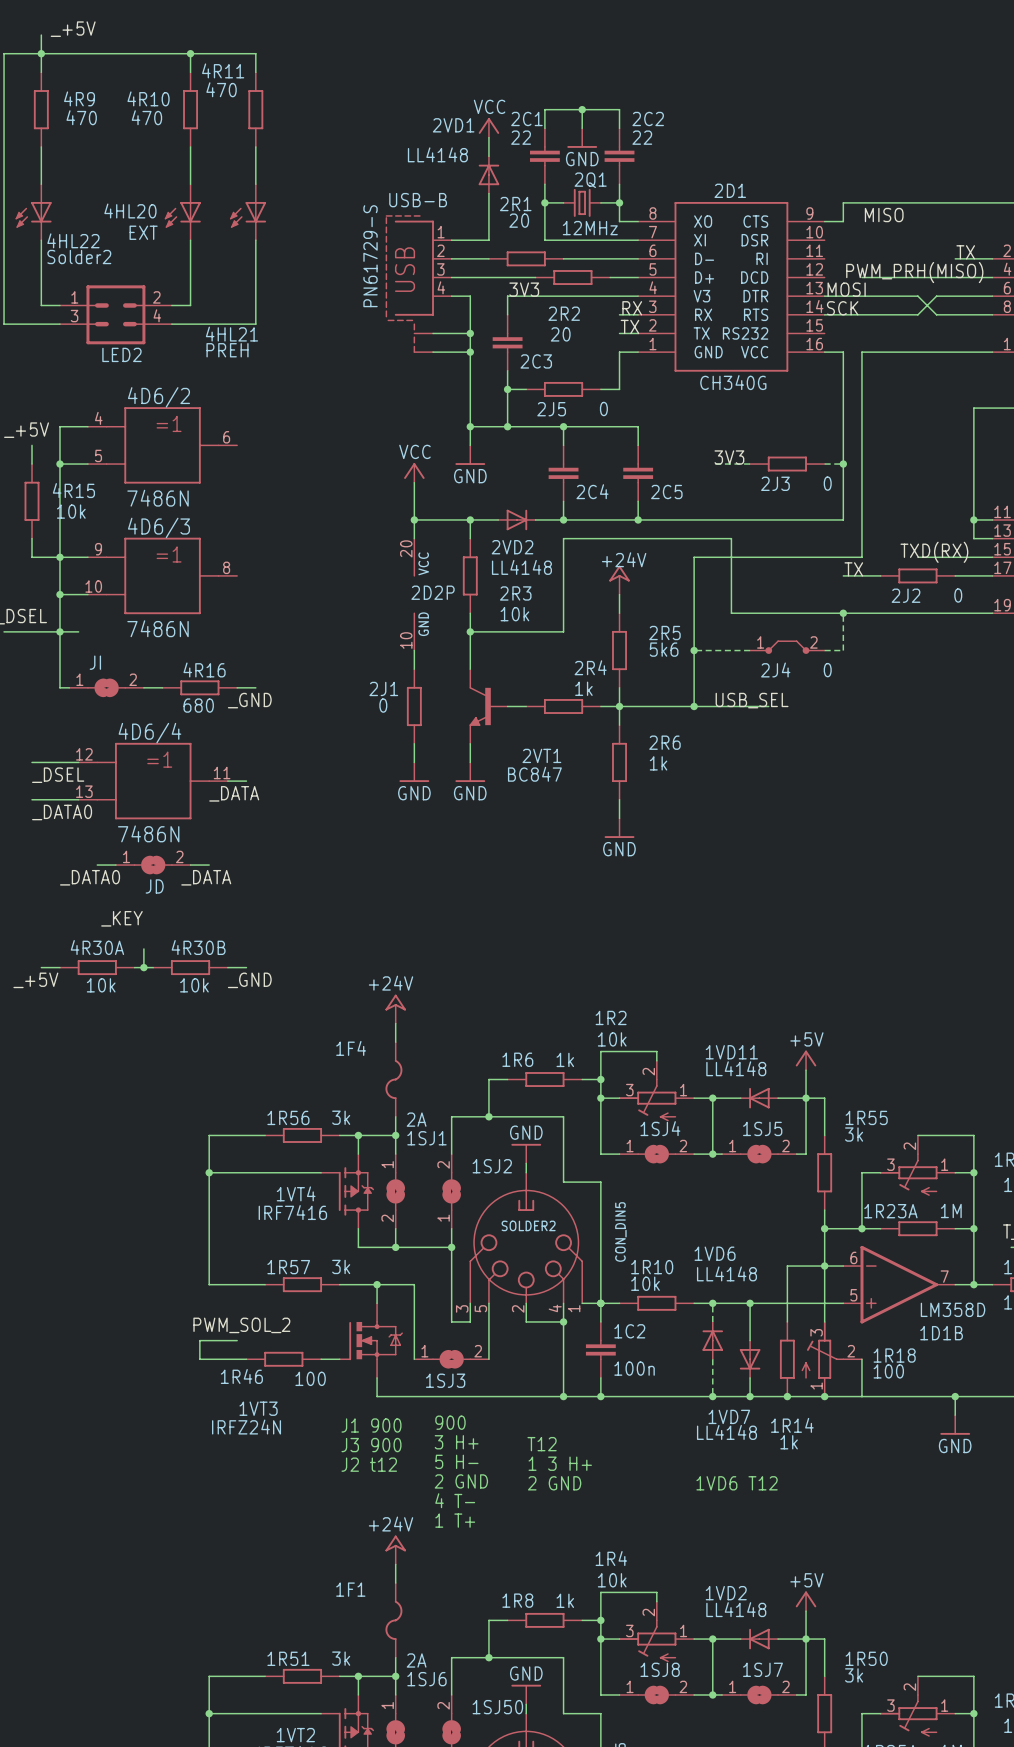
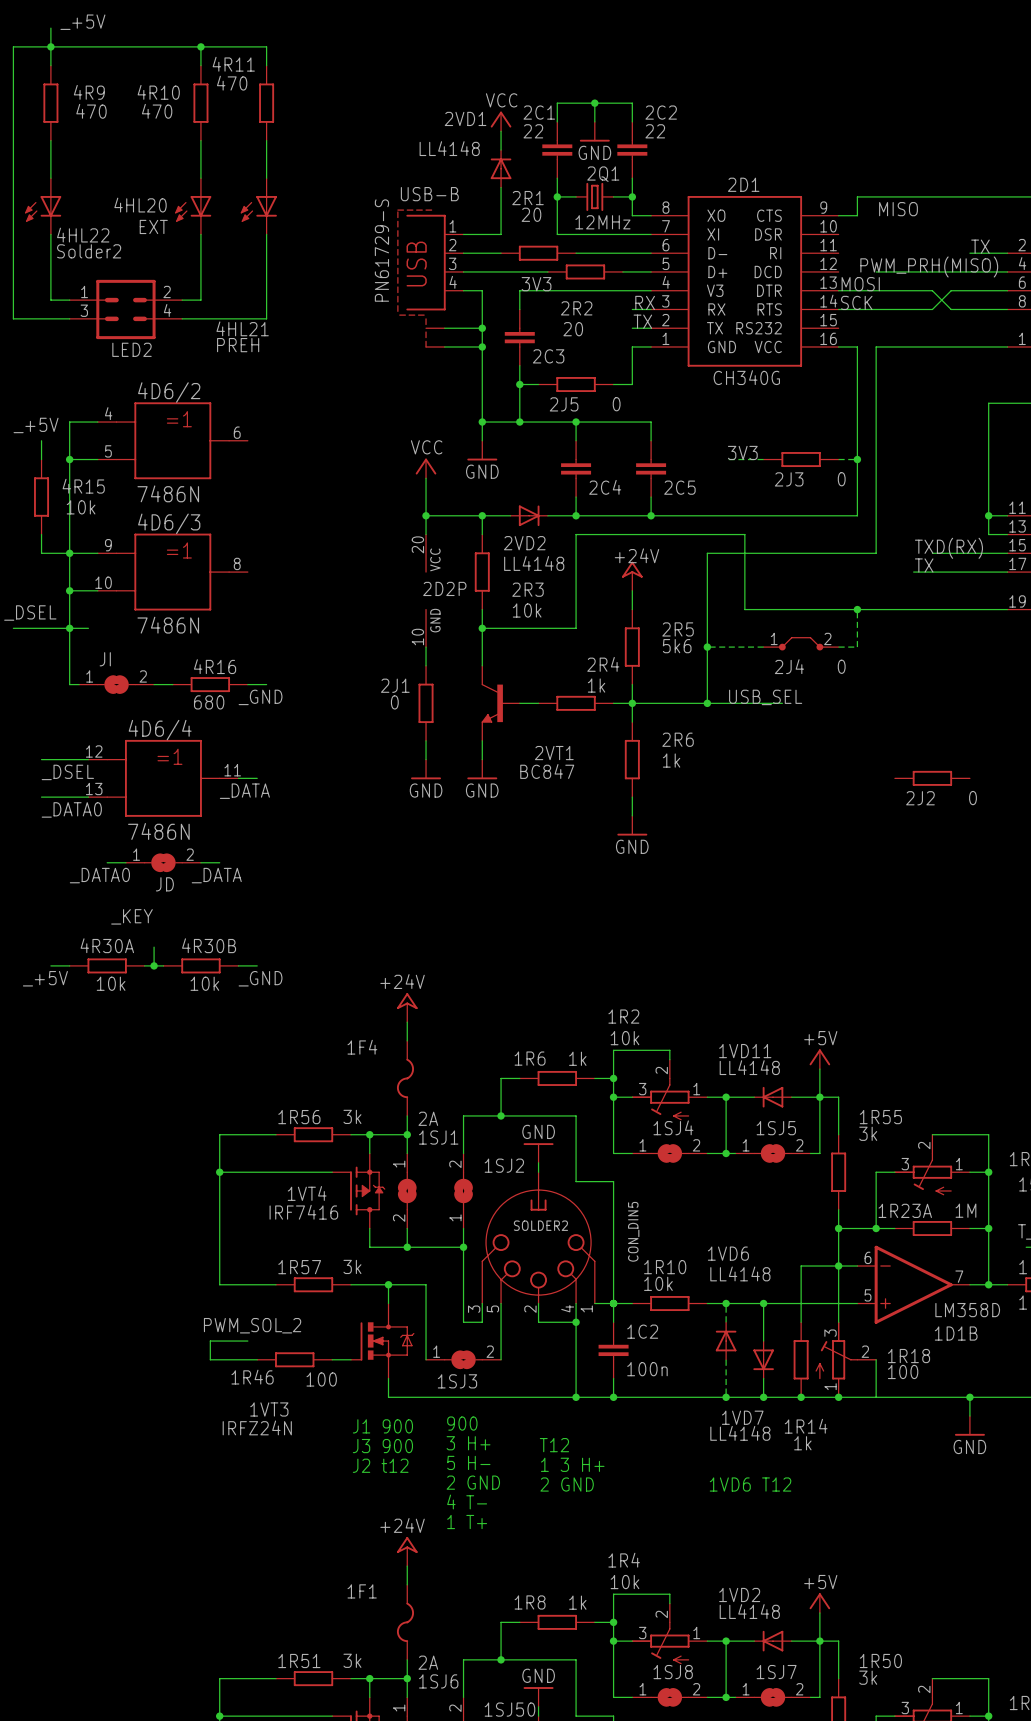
label position: TX (853, 569) -> TX (924, 565)
wire: (843, 575) (880, 575) -> none
wire: none -> (913, 572) (969, 572)
2J2 position: (917, 575) -> (932, 778)

